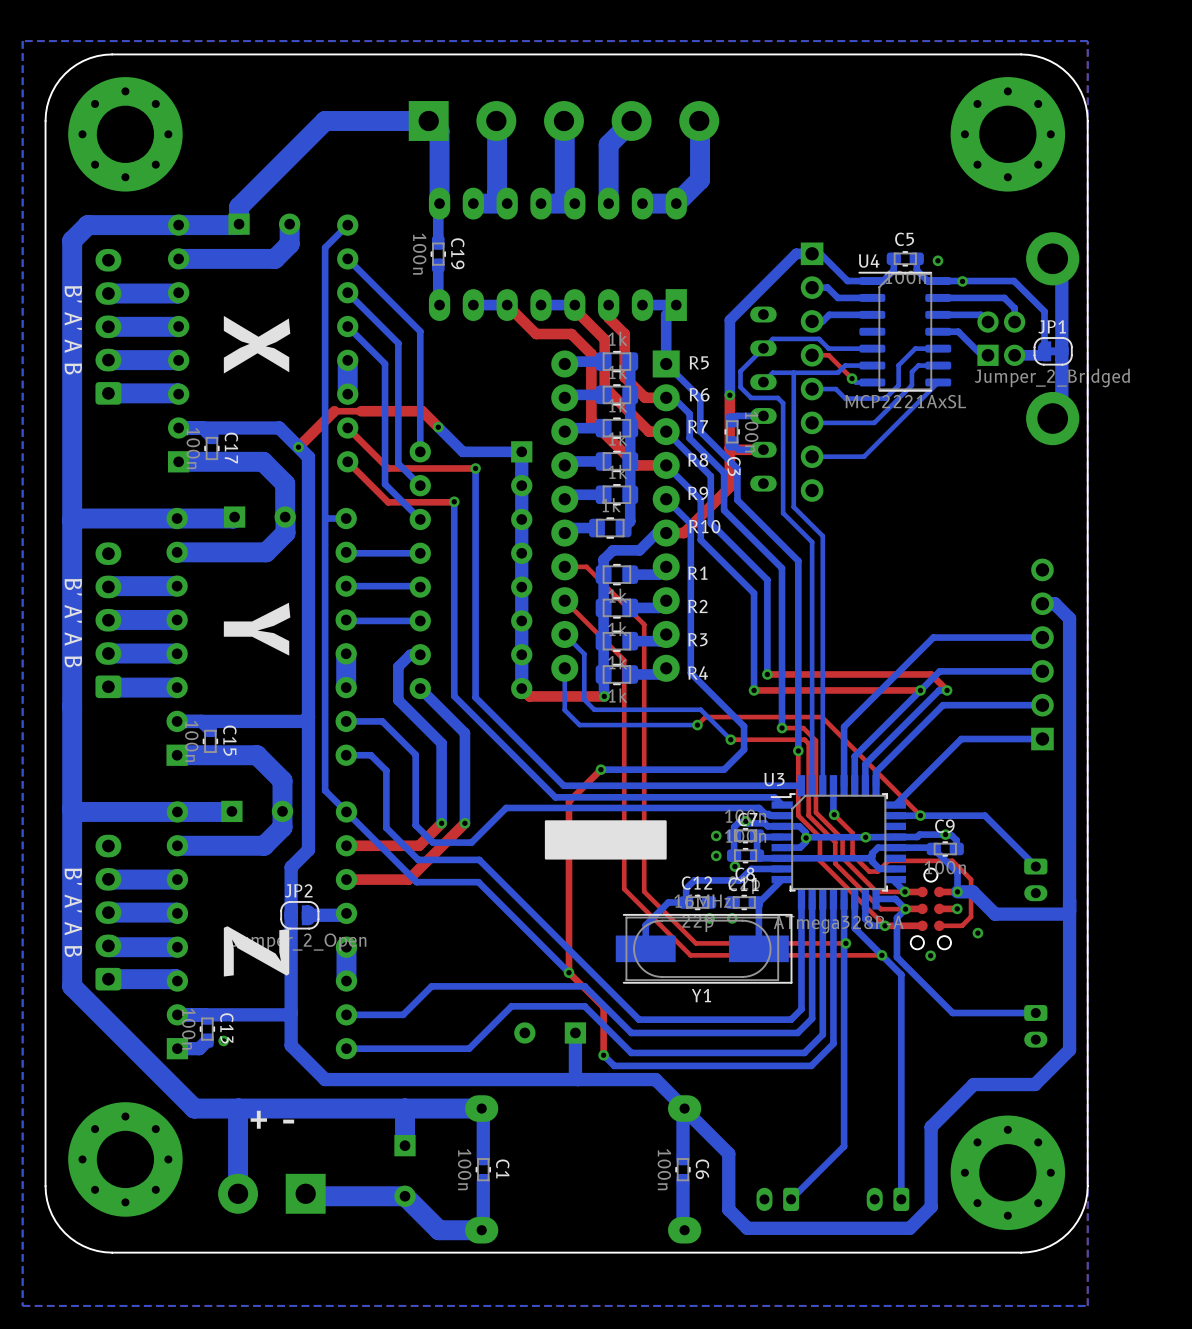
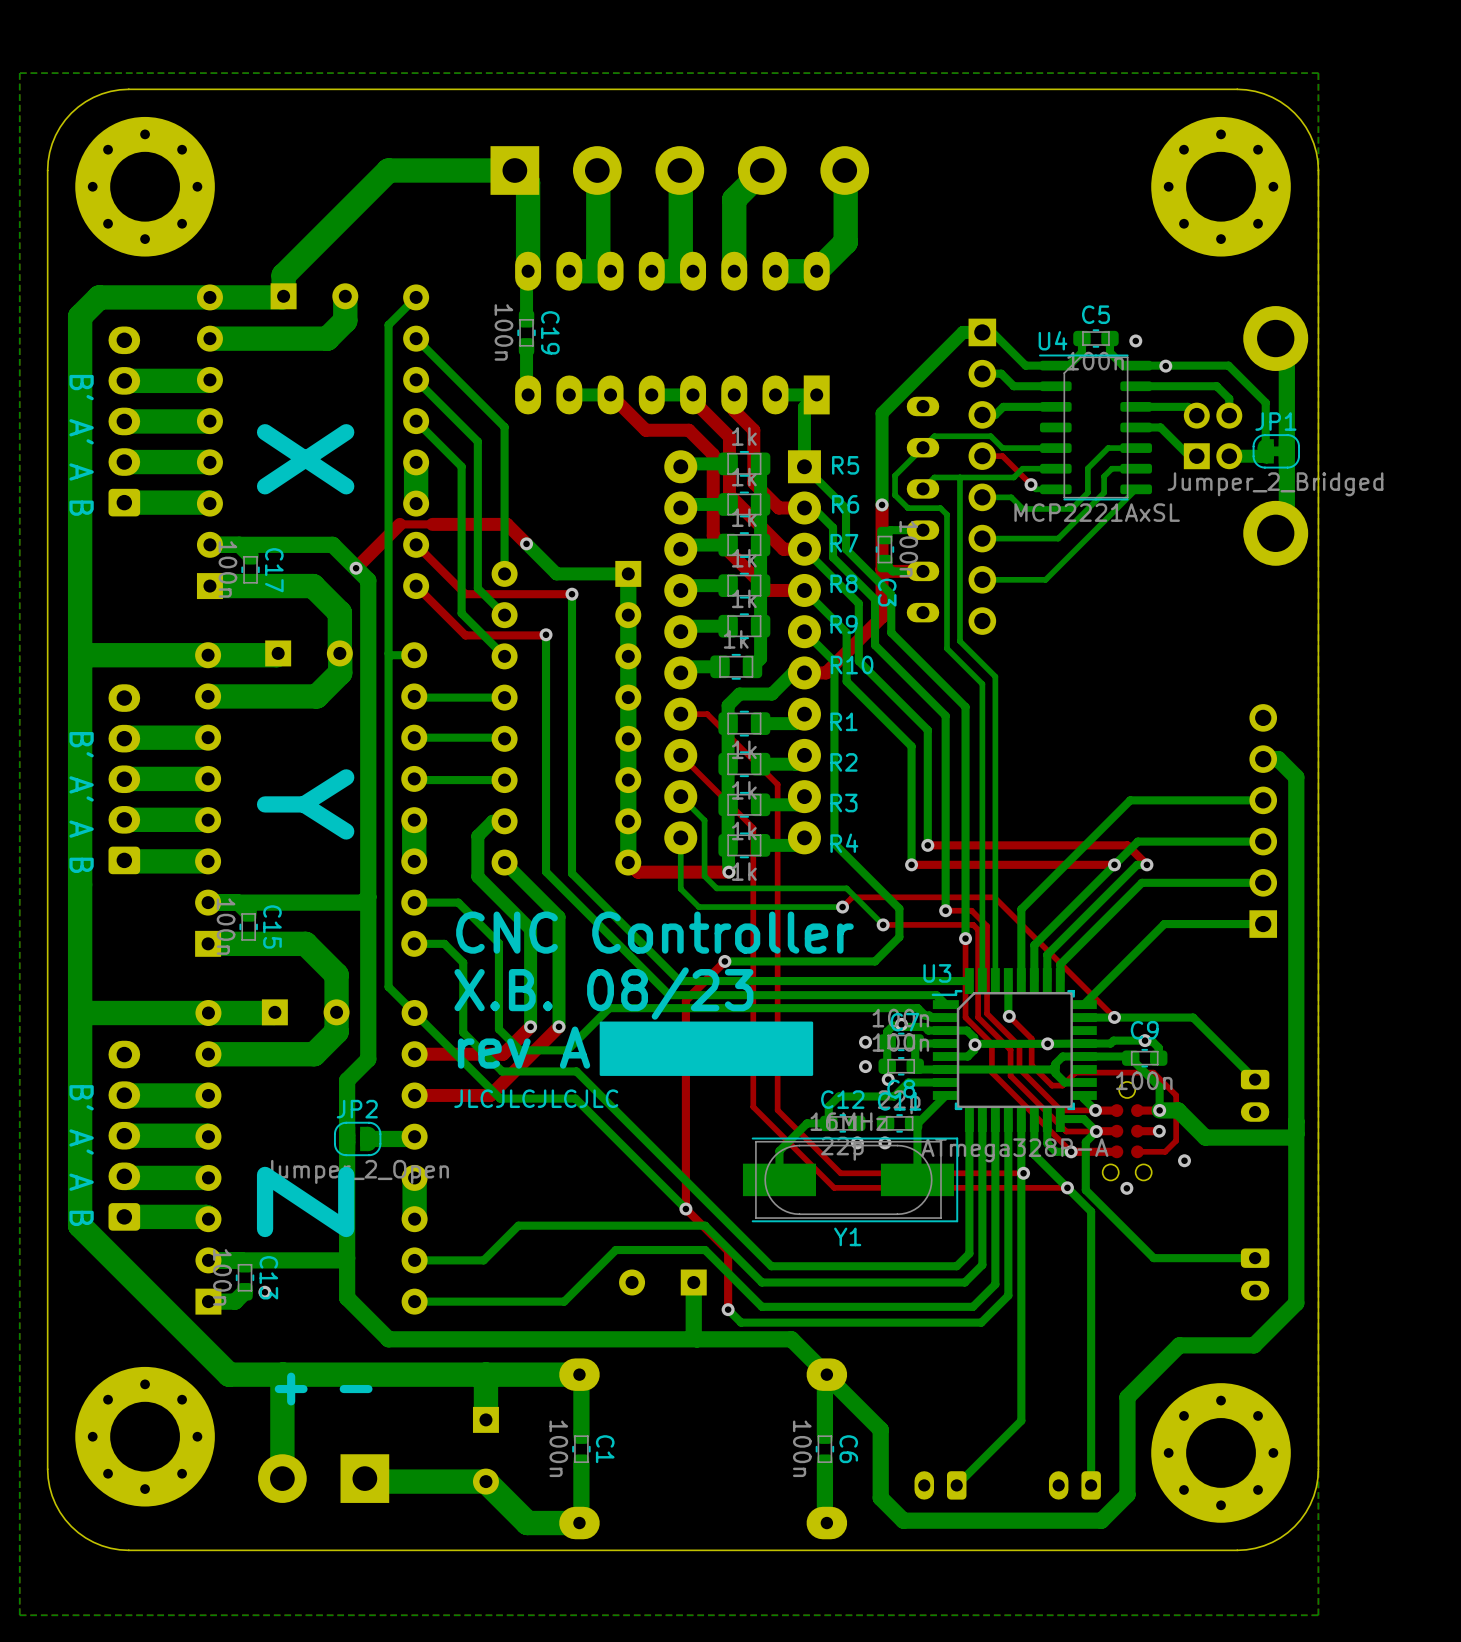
text: none -> CNC Controller (654, 932)
text: none -> X.B. 08/23 (603, 993)
drawing: none -> [599, 1021, 814, 1076]
drawing: [544, 820, 667, 860] -> none
text: none -> rev A (524, 1047)
text: none -> JLCJLCJLCJLC (536, 1098)

